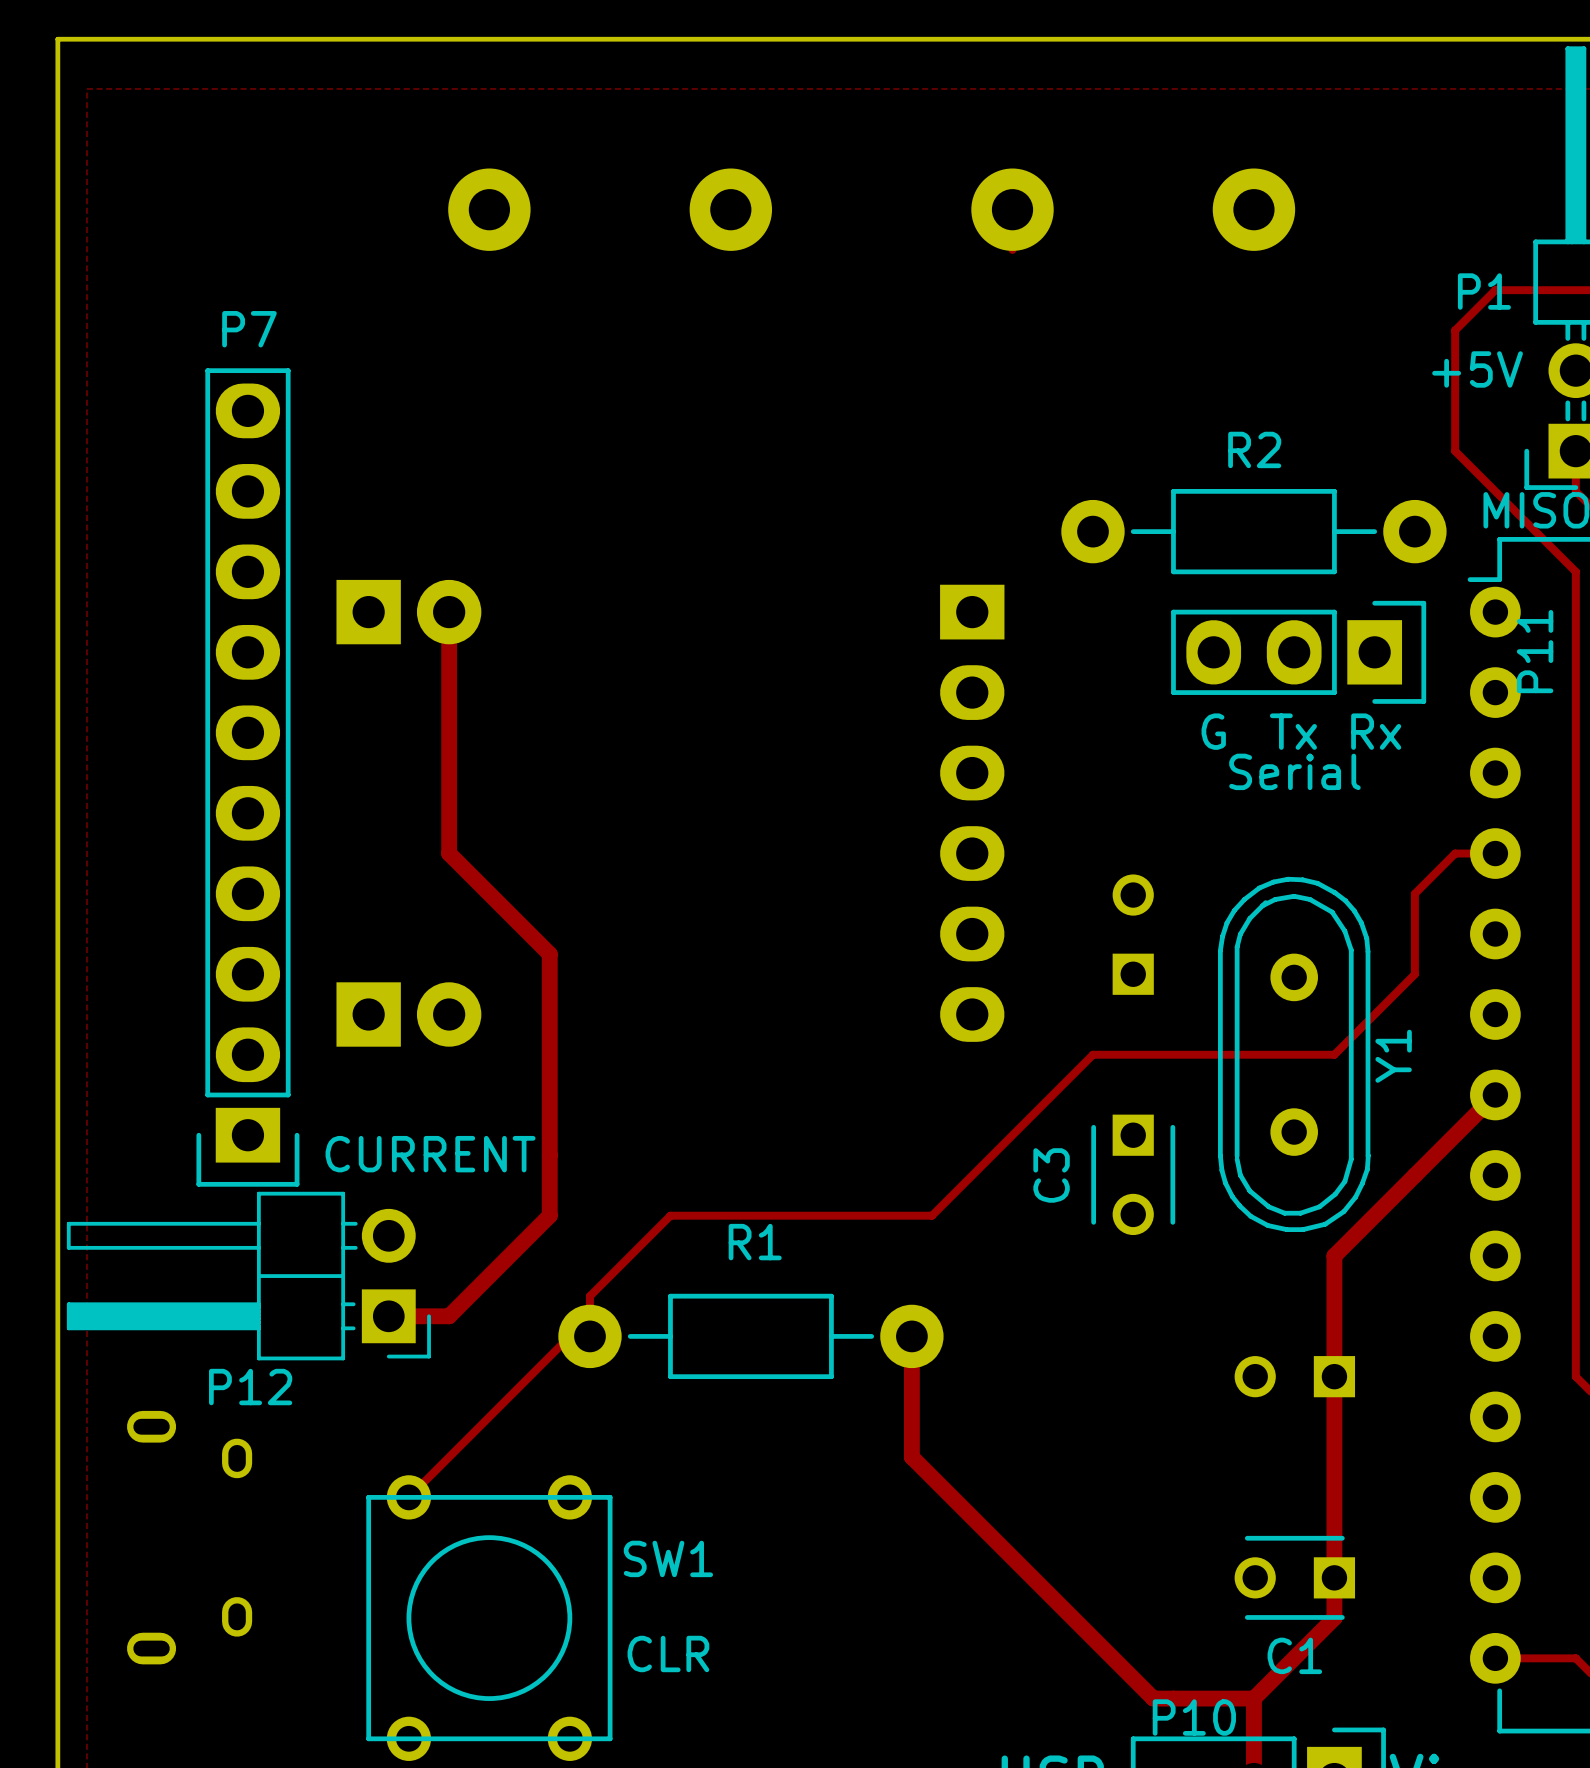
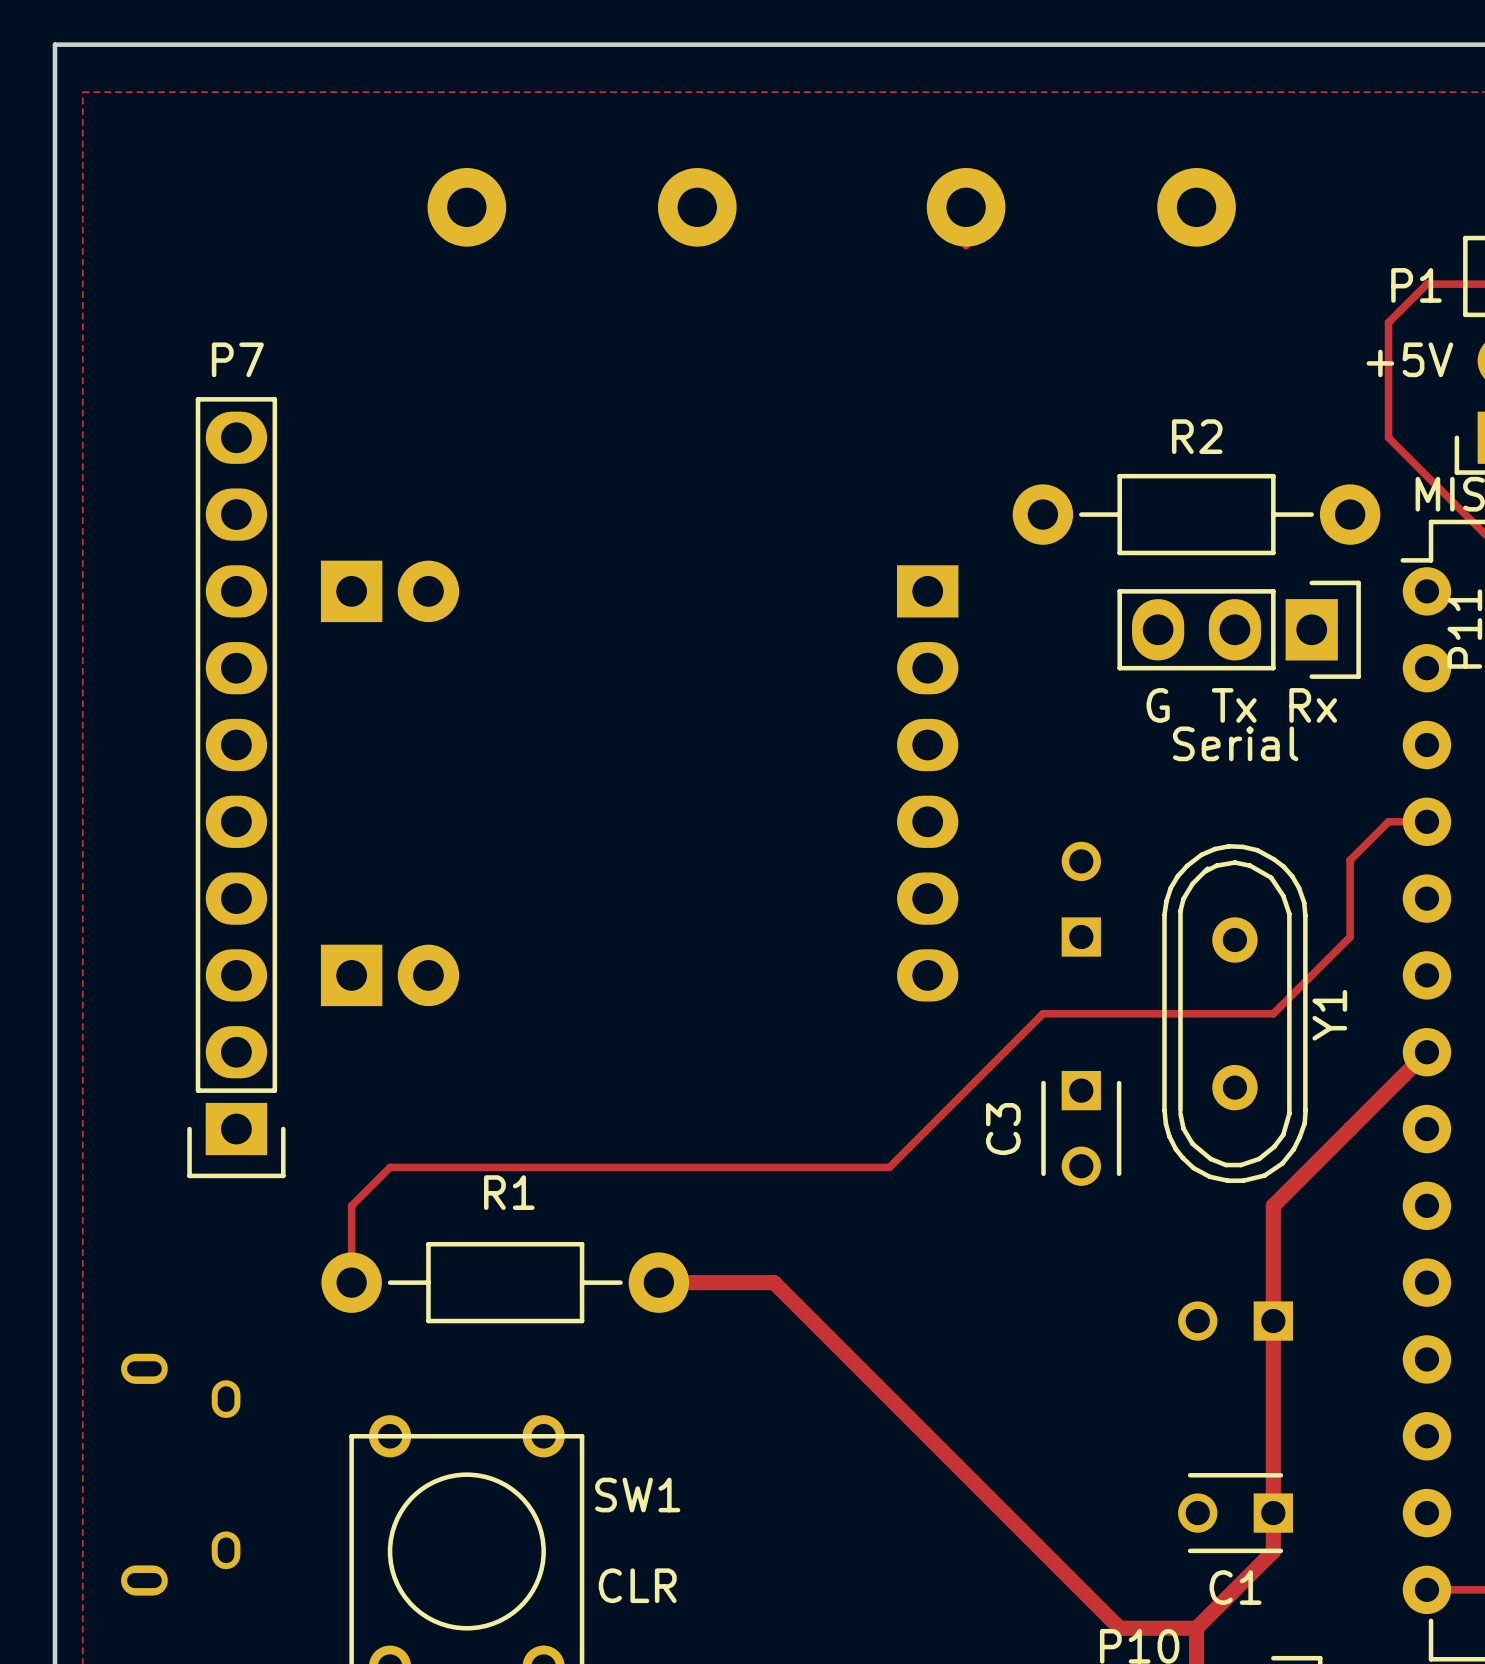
track: (449, 612) (449, 853) (549, 954) (549, 1215) (449, 1316) (388, 1316) -> none
P7 position: (247, 777) -> (236, 787)
track: (670, 1215) (589, 1296) (589, 1336) (569, 1336) (408, 1497) -> (639, 1167) (390, 1167) (351, 1205) (351, 1282)
P12: CURRENT (248, 1276) -> none
R1 position: (750, 1336) -> (505, 1282)
track: (911, 1336) (911, 1457) (1153, 1698) (1173, 1698) -> (658, 1282) (774, 1282) (1119, 1628)

